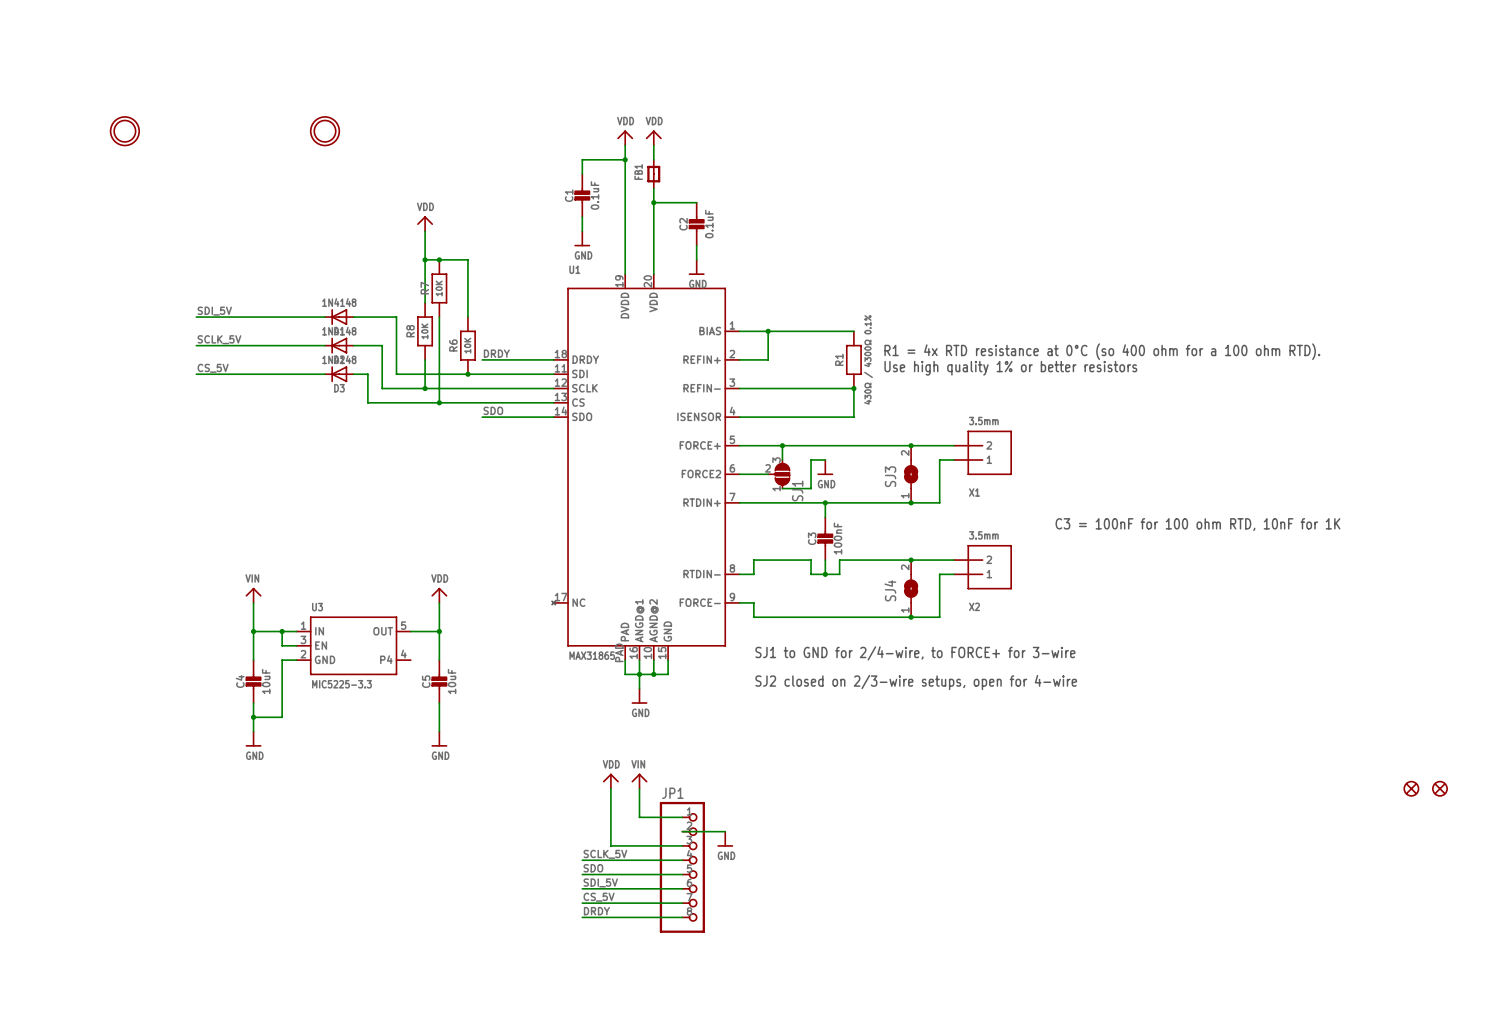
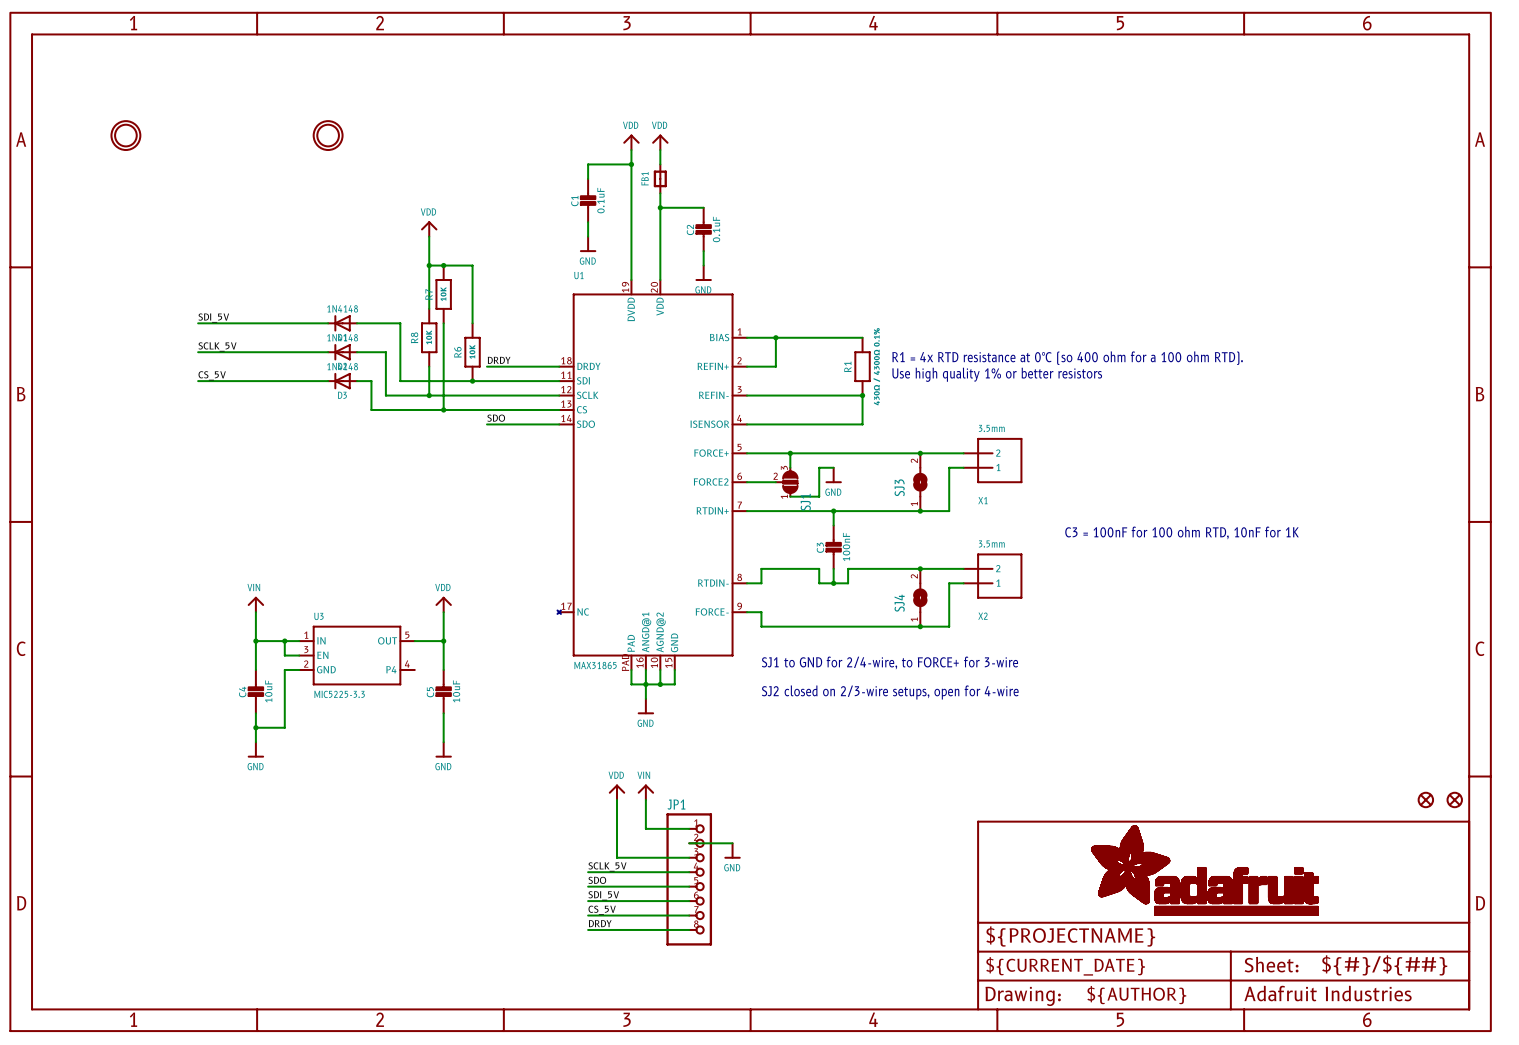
drawing: none -> [10, 12, 1491, 1032]

